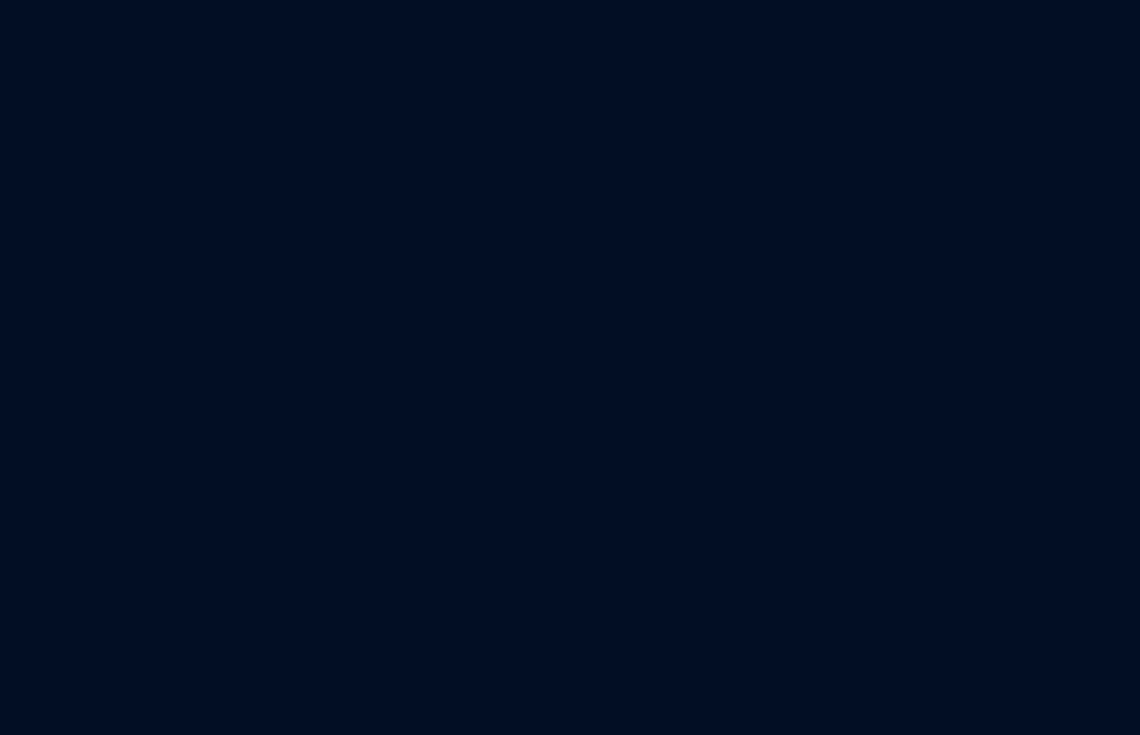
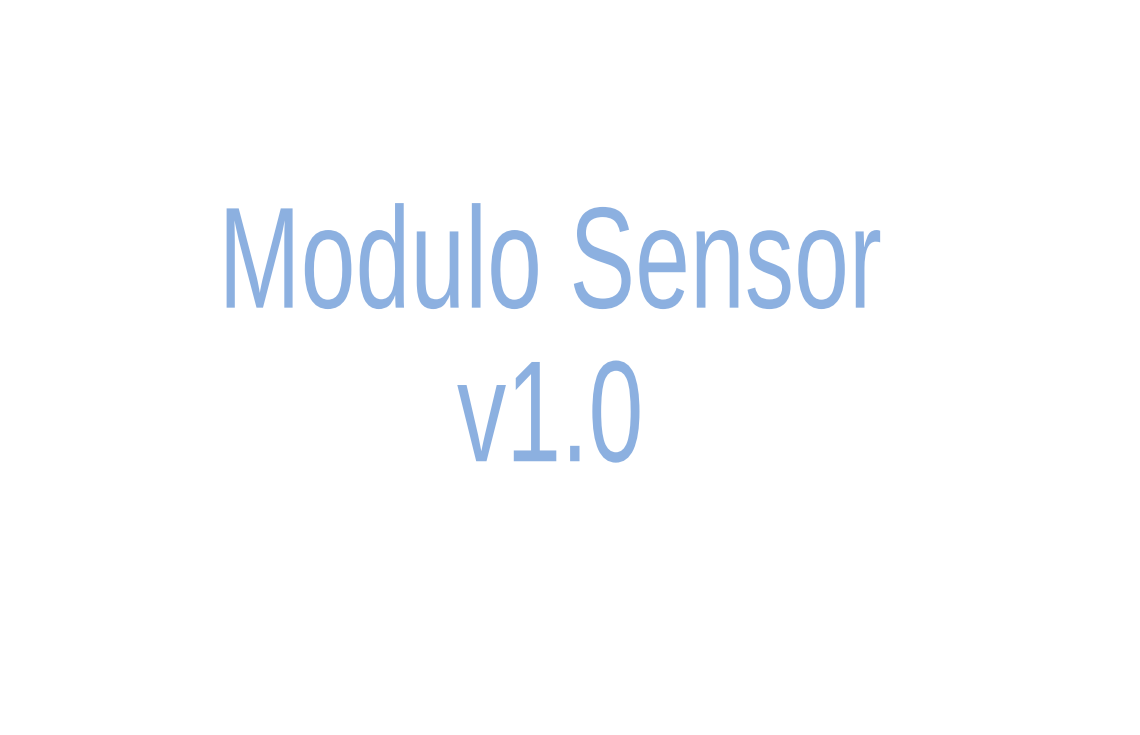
text: none -> Modulo Sensor (553, 256)
text: none -> v1.0 (548, 411)

